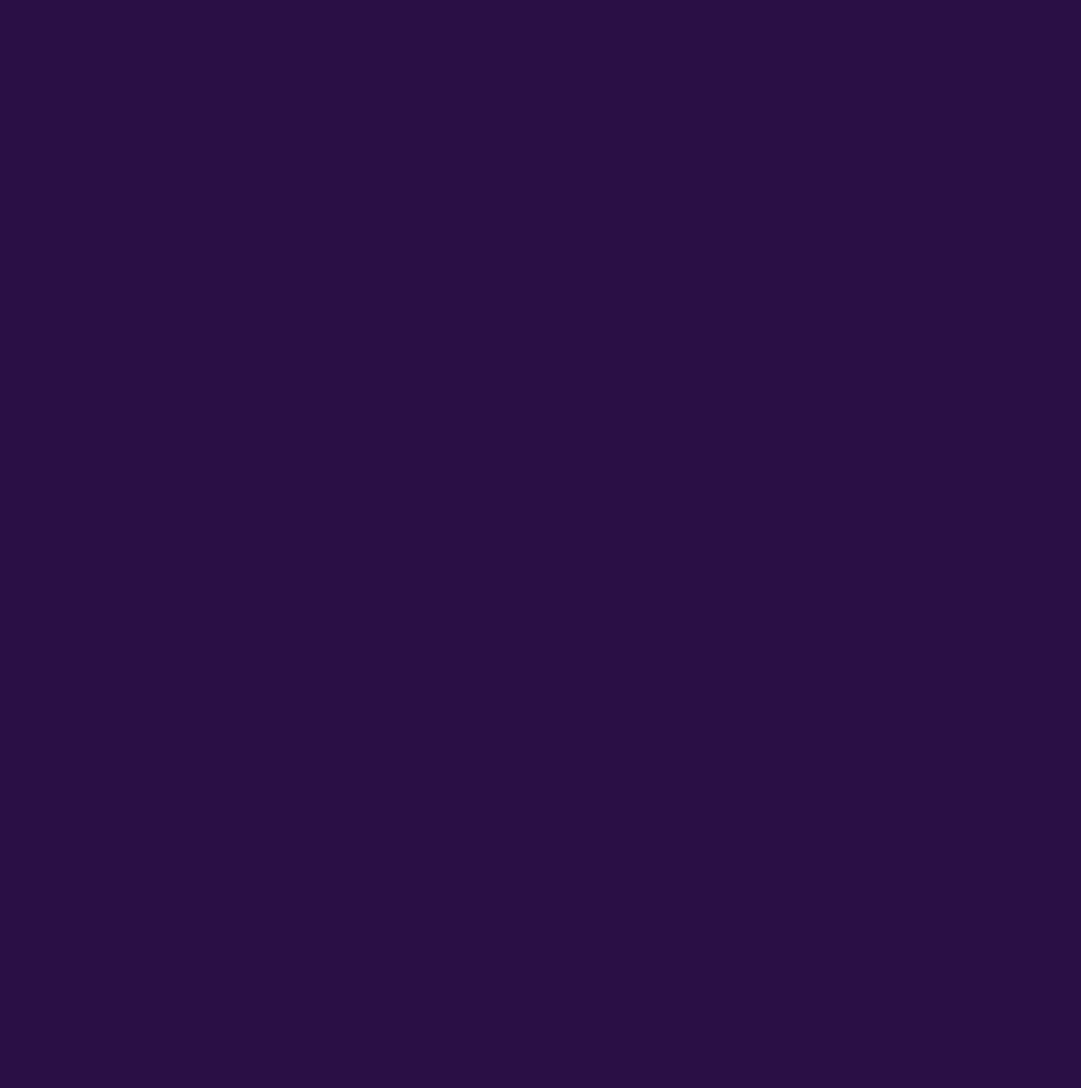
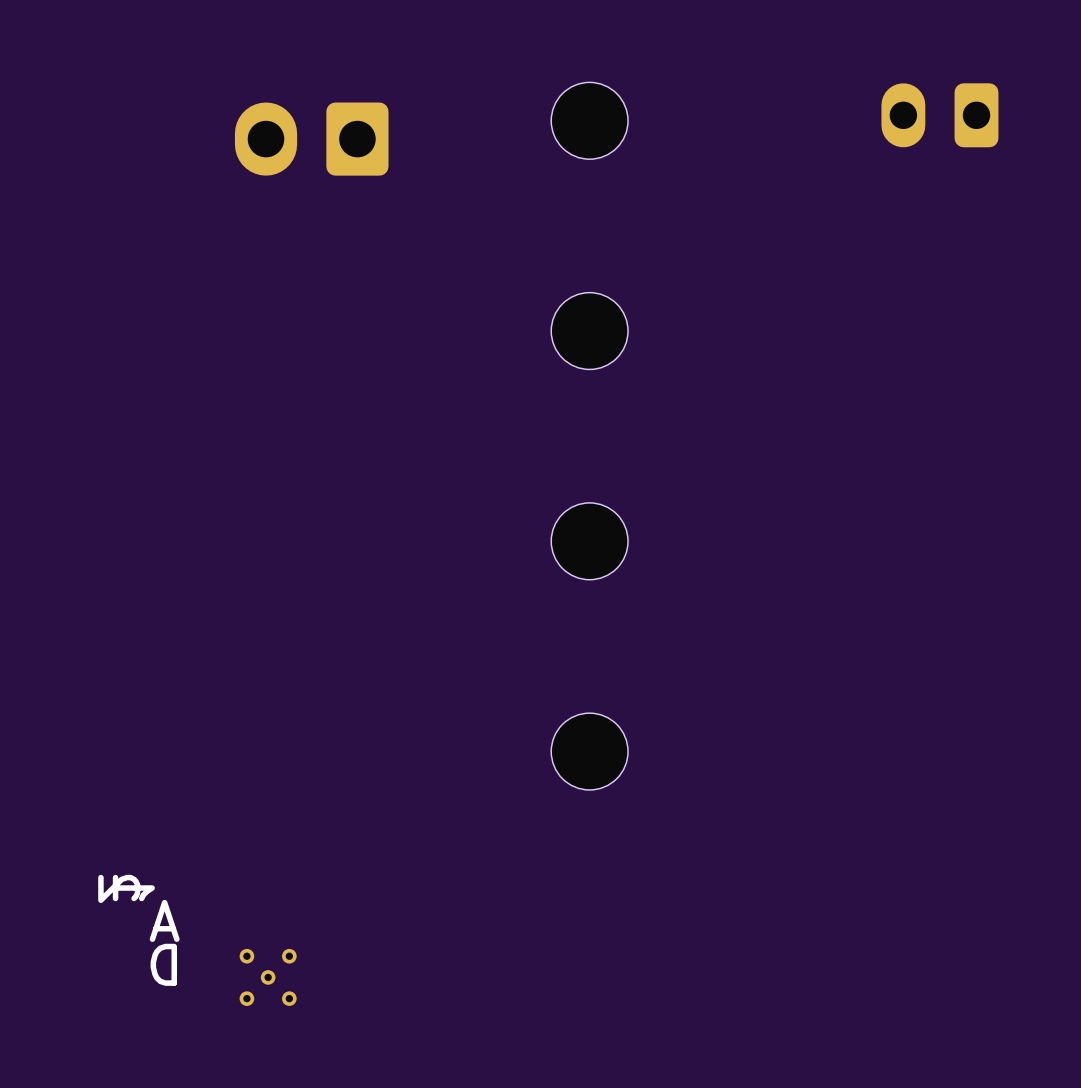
part: none -> (939, 115)
part: none -> (589, 120)
part: none -> (311, 139)
part: none -> (589, 331)
part: none -> (589, 541)
part: none -> (589, 751)
part: none -> (138, 930)
part: none -> (268, 977)

